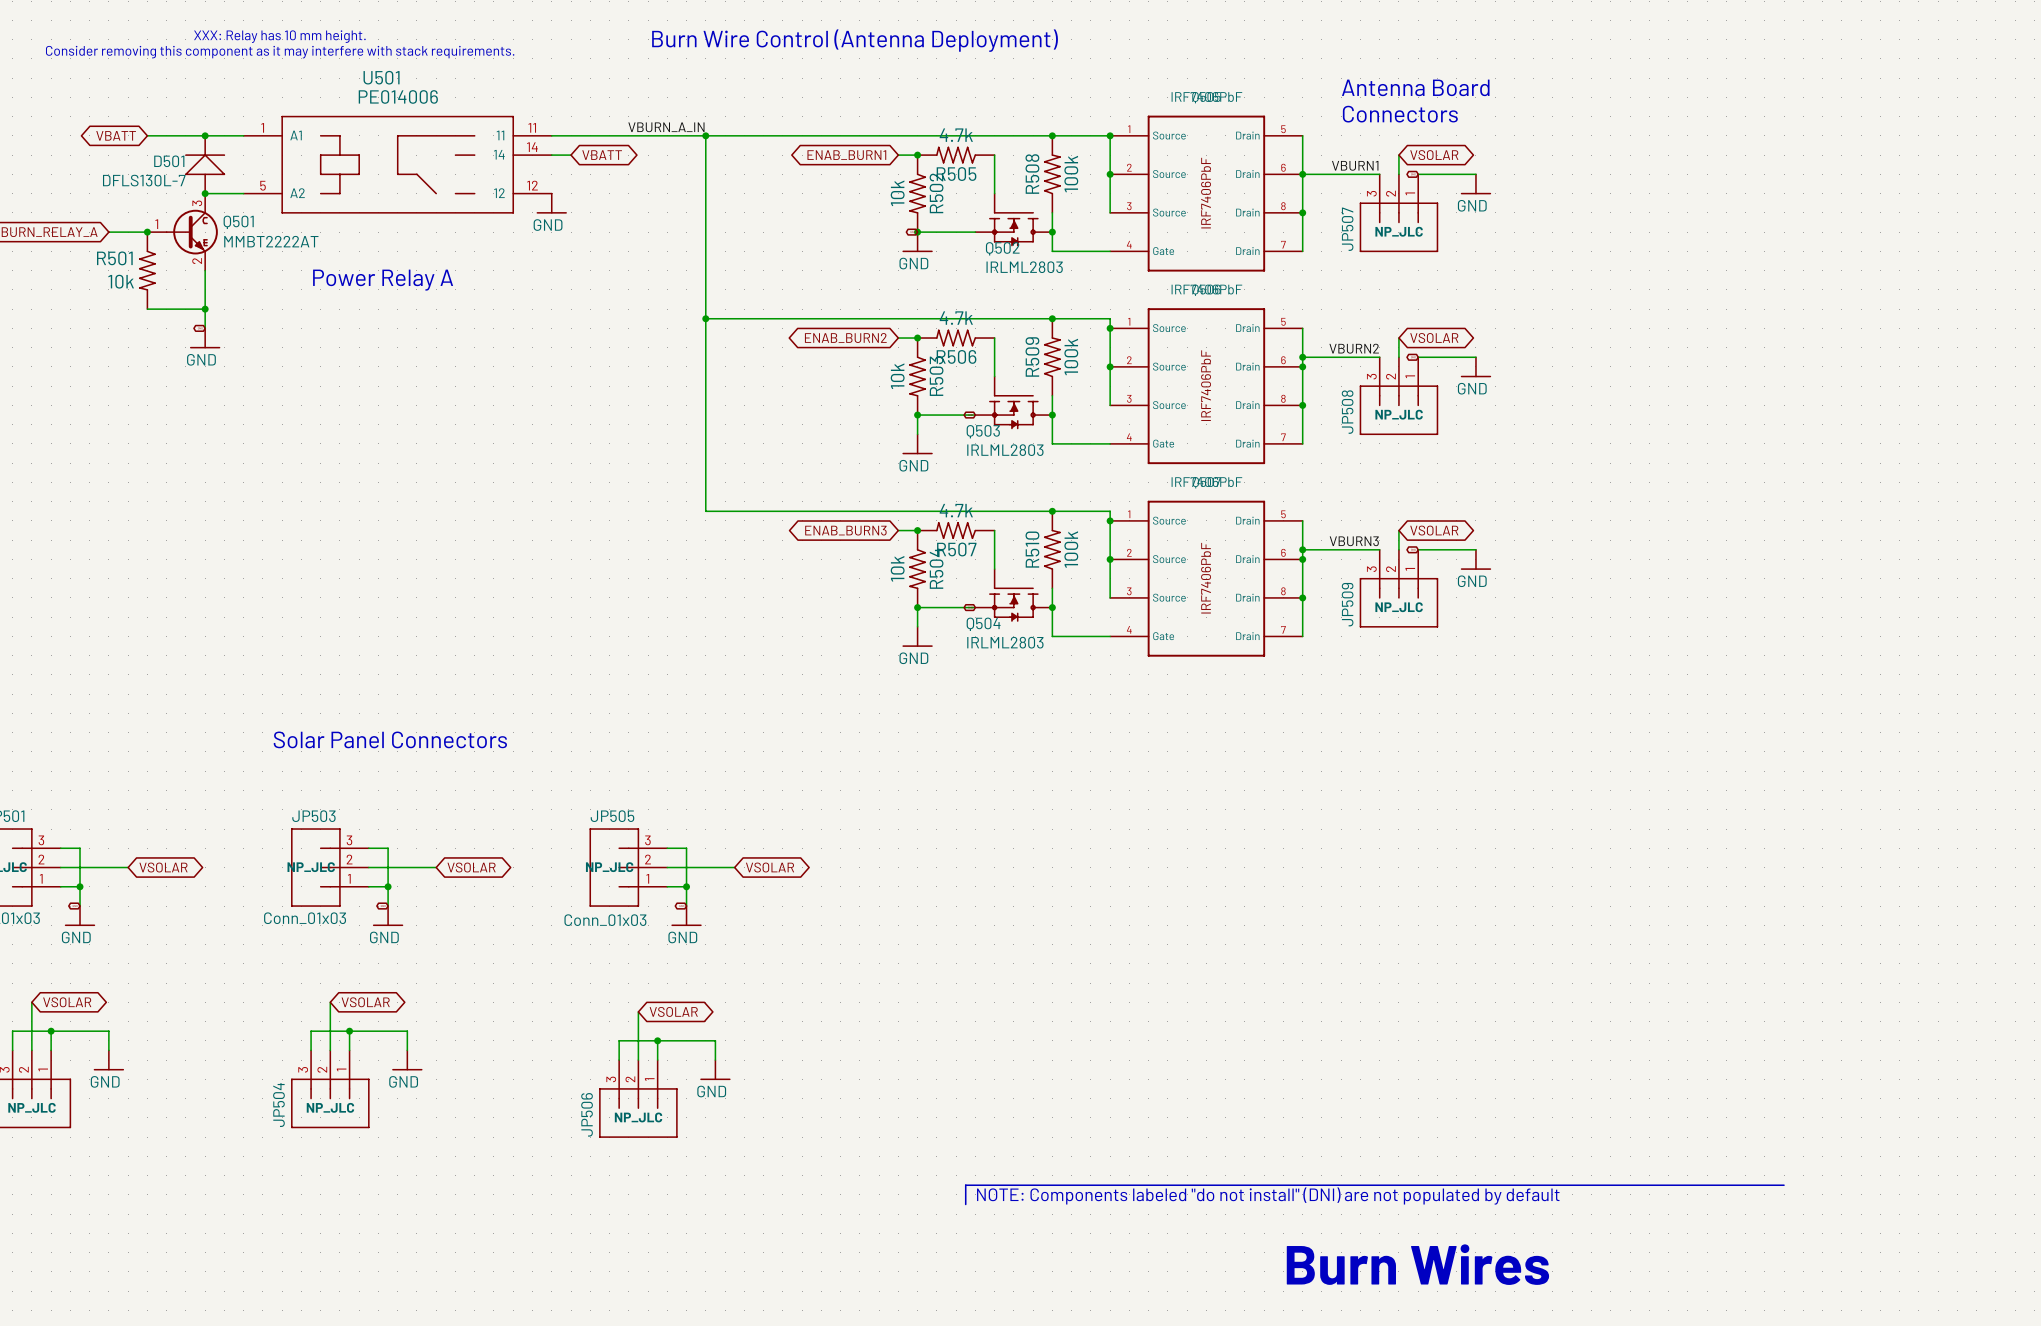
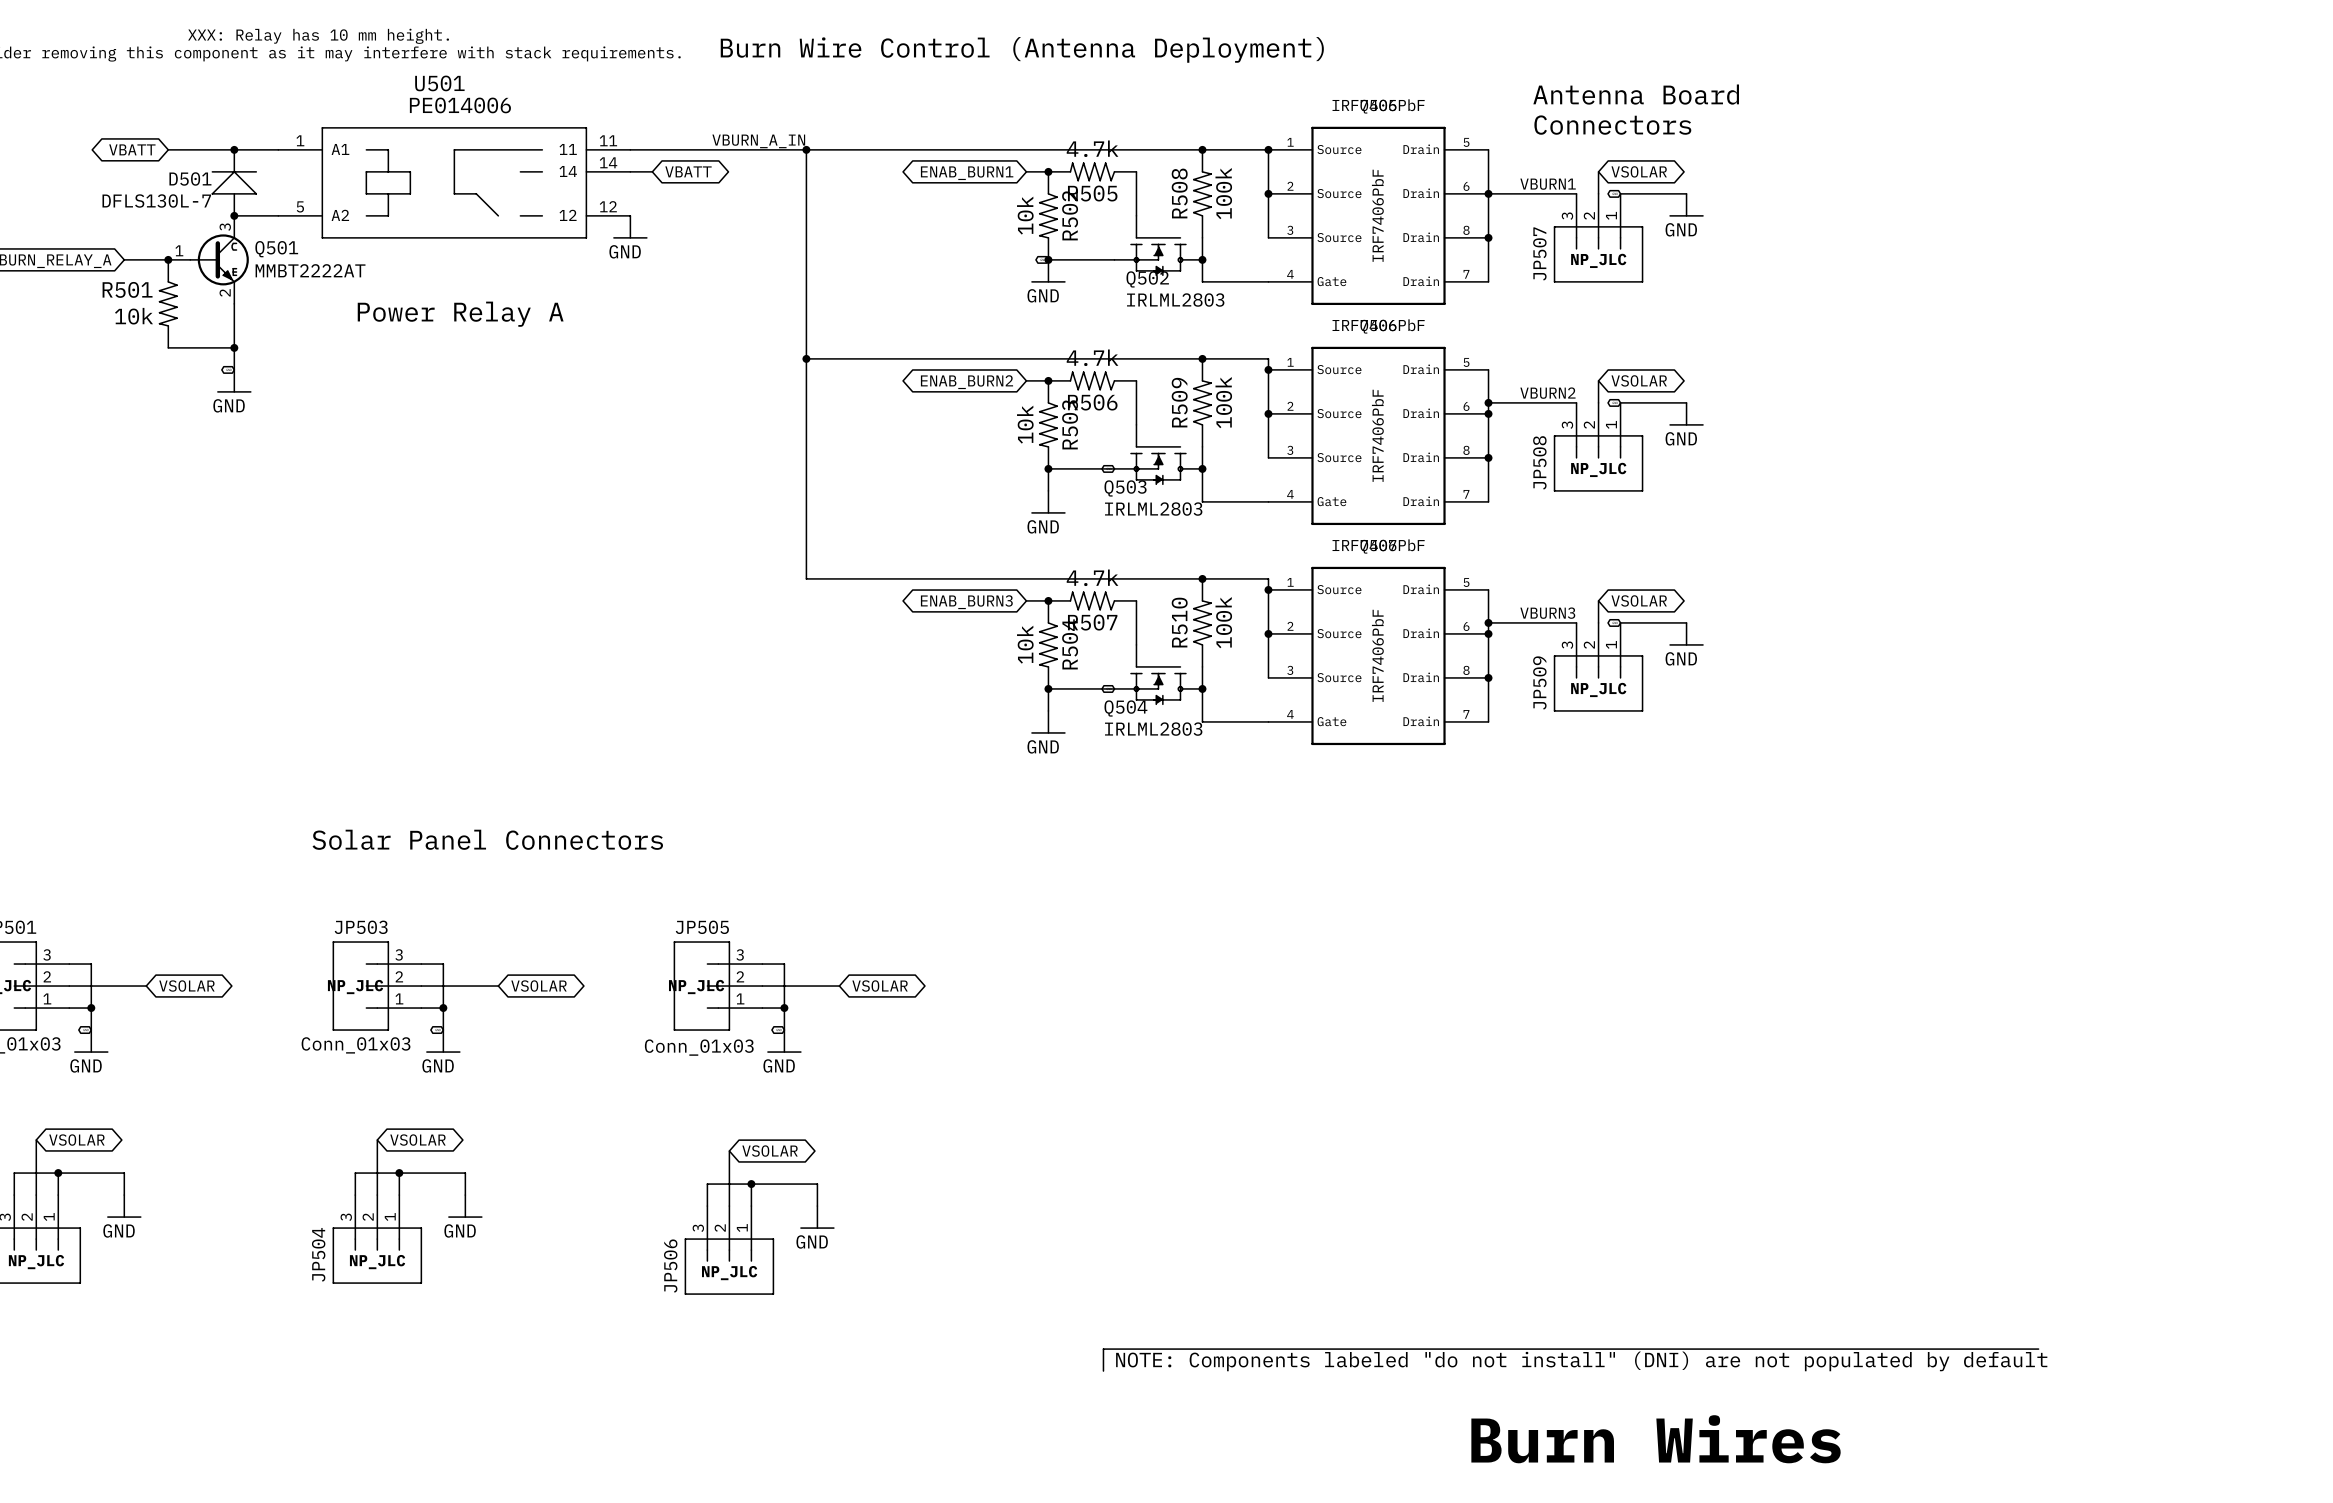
text position: Burn Wire Control (Antenna Deployment) (855, 40) -> Burn Wire Control (Antenna Deployment) (1022, 49)

